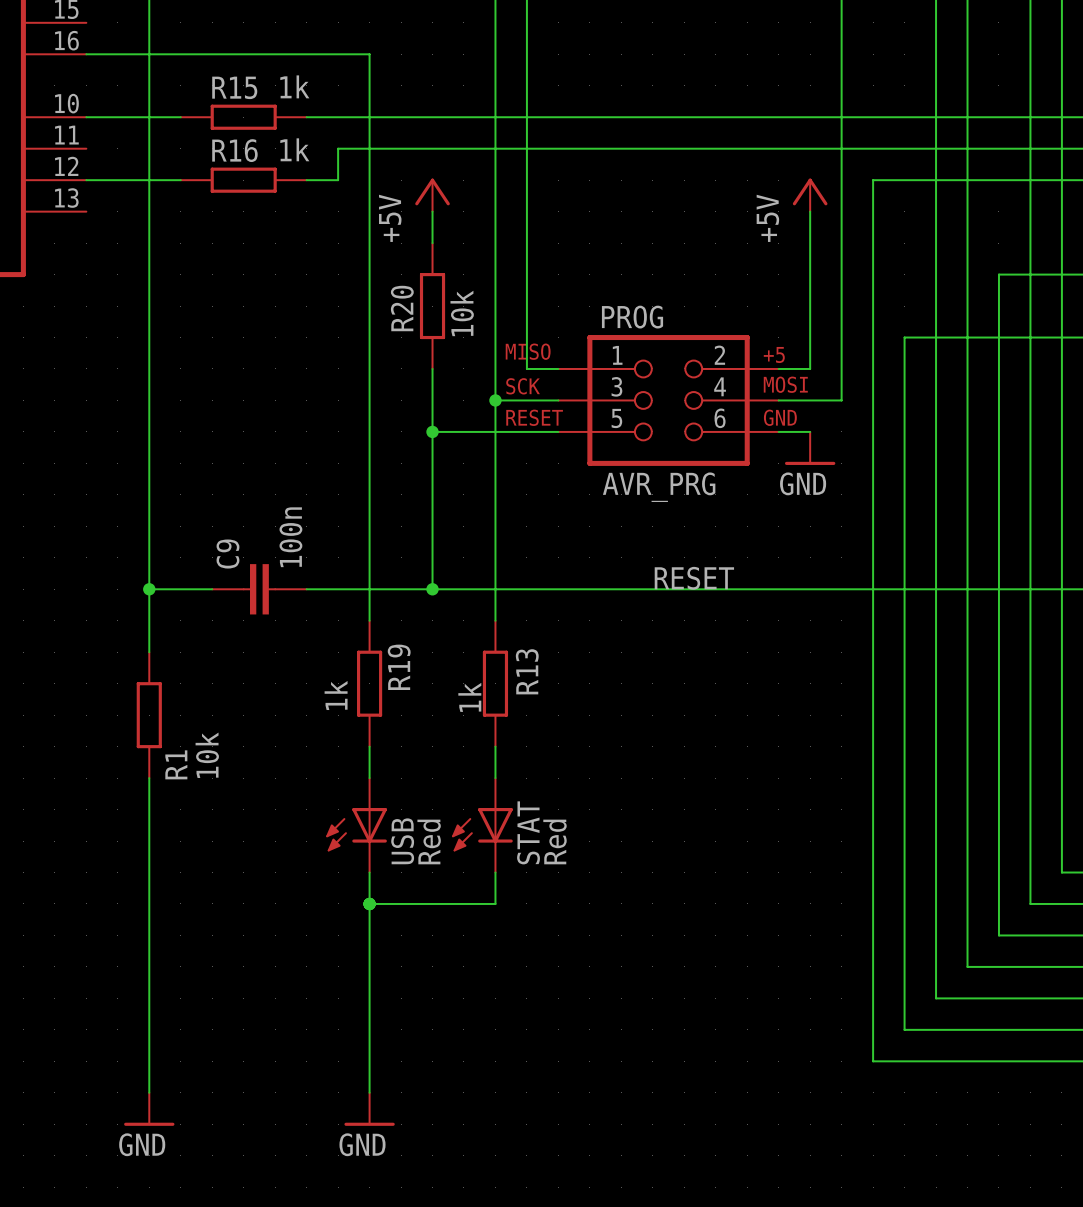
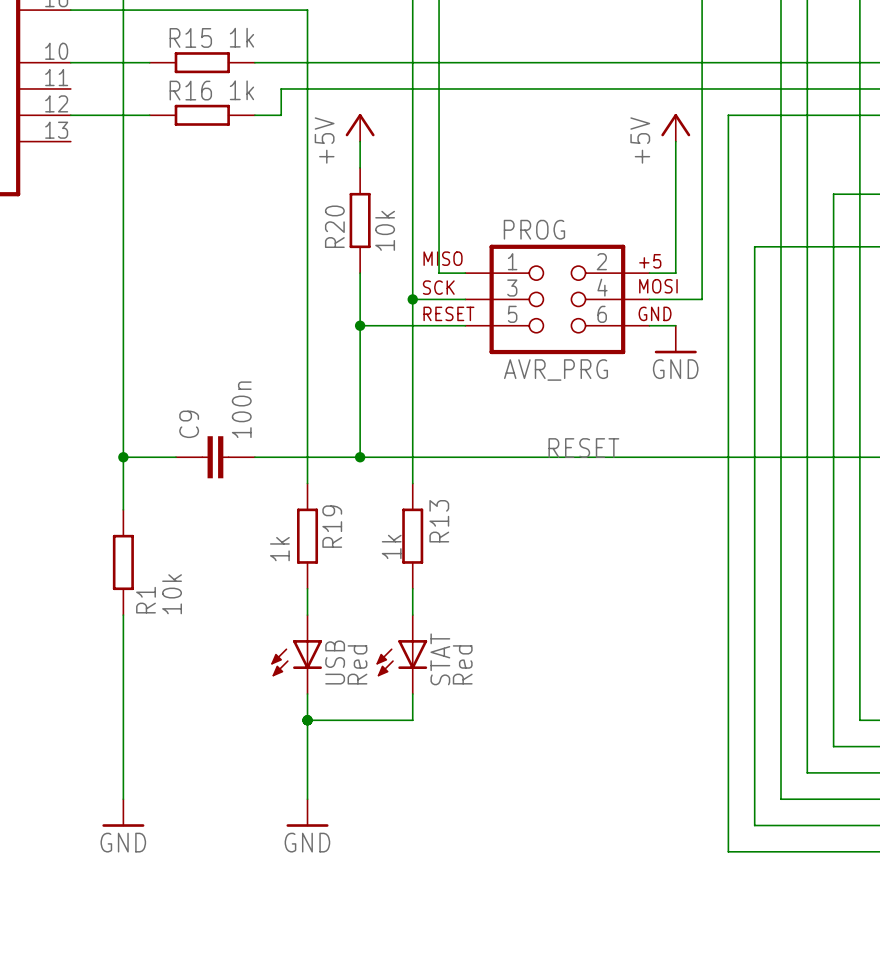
wire: (149, 998) (149, 1092) -> none
wire: (369, 998) (369, 1092) -> none
power symbol position: GND (149, 1109) -> GND (123, 813)
power symbol position: GND (369, 1109) -> GND (307, 813)

